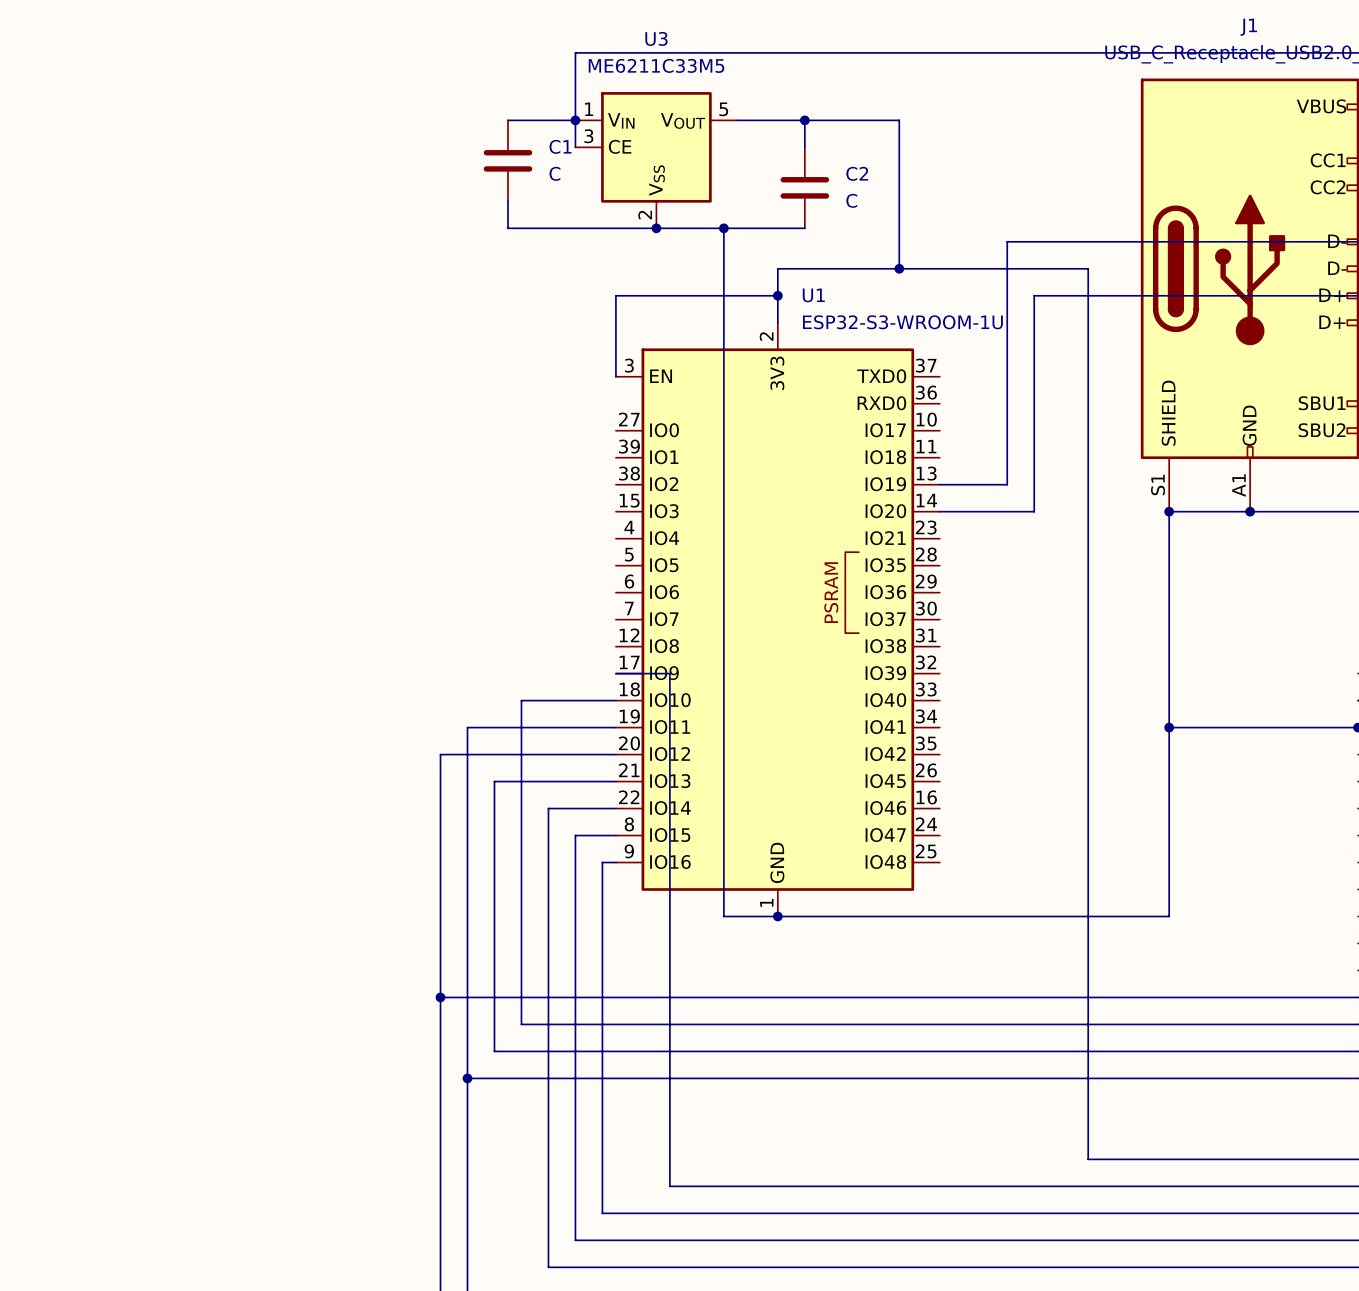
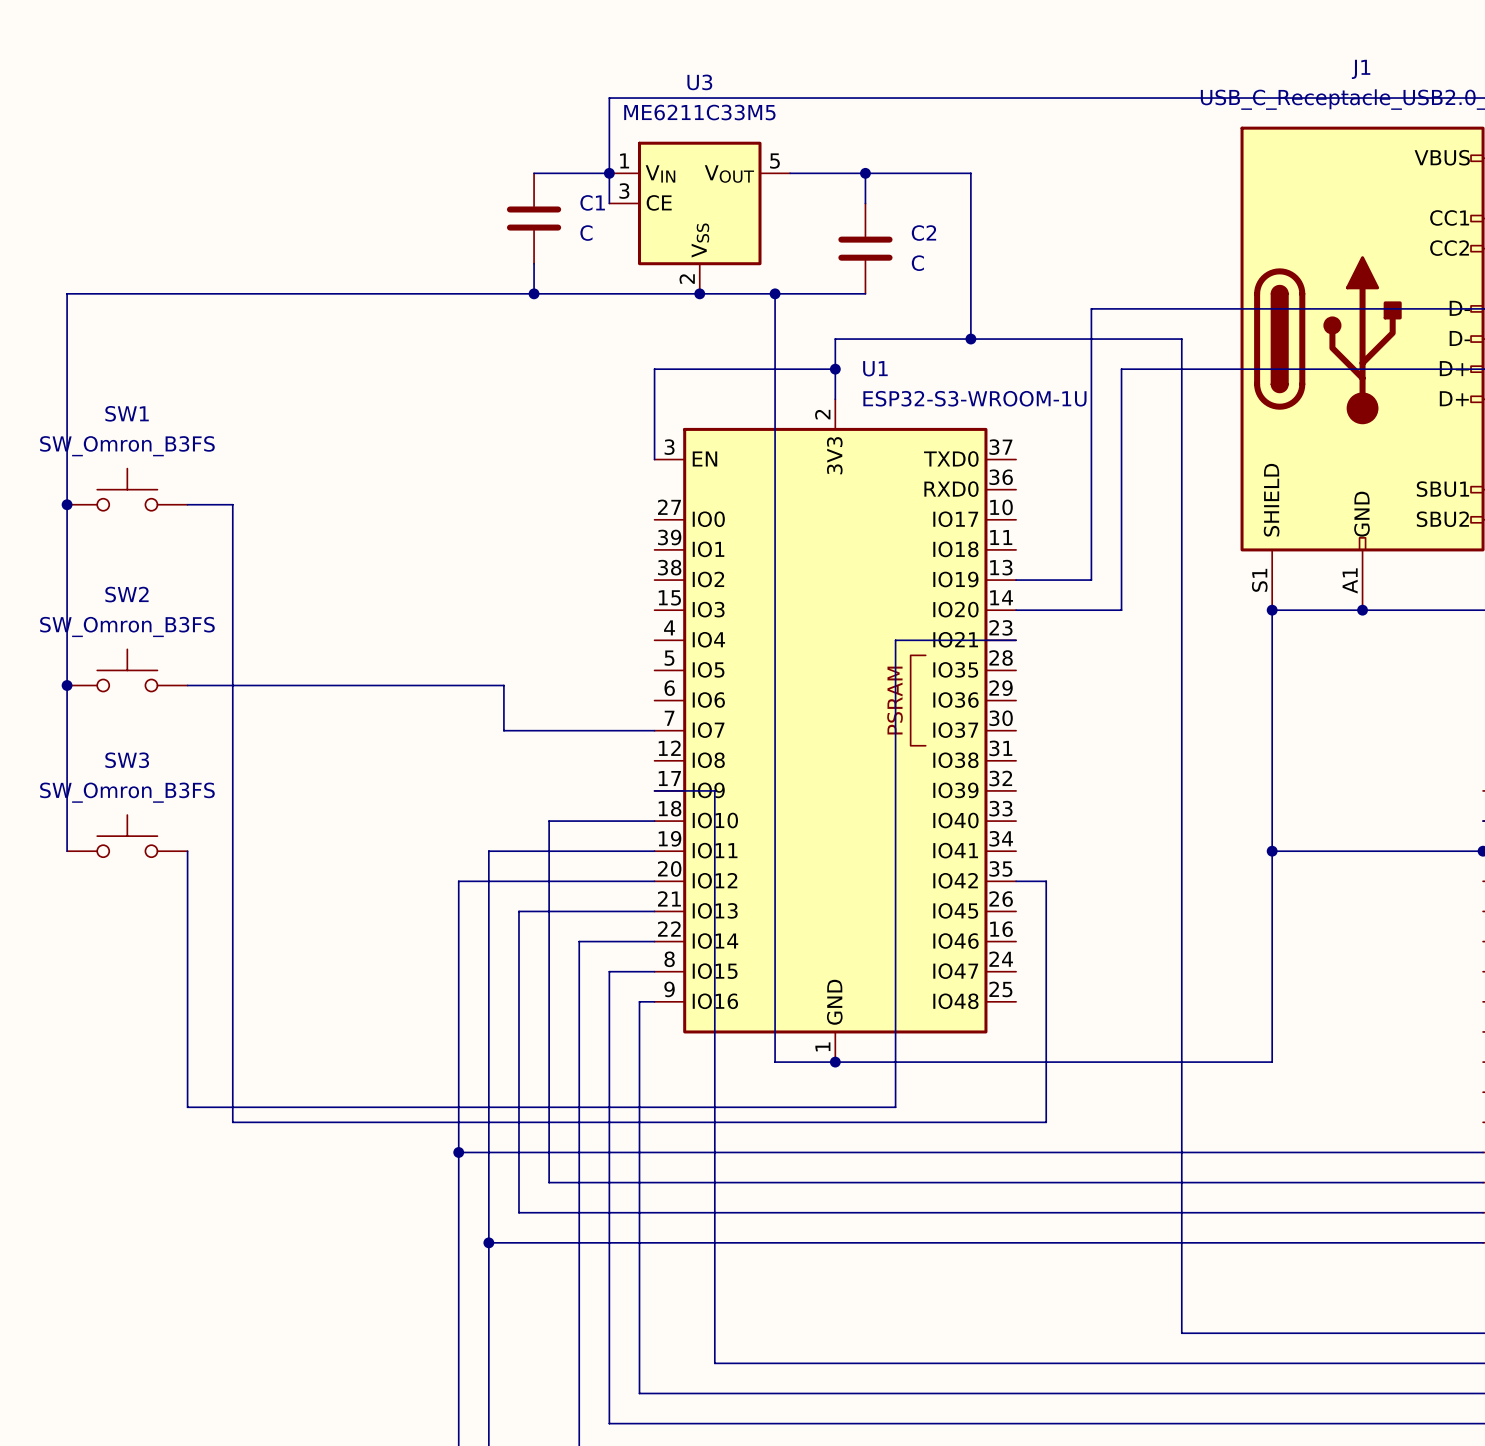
wire: none -> (534, 293) (67, 293) (67, 851)
junction: none -> (534, 293)
SW1: none -> SW_Omron_B3FS (127, 489)
junction: none -> (67, 504)
wire: none -> (187, 504) (232, 504) (232, 1122) (1046, 1122) (1046, 881) (1016, 881)
wire: none -> (1016, 640) (895, 640) (895, 1107) (187, 1107) (187, 851)
SW2: none -> SW_Omron_B3FS (127, 670)
junction: none -> (67, 685)
wire: none -> (187, 685) (503, 685) (503, 730) (654, 730)
SW3: none -> SW_Omron_B3FS (127, 836)

